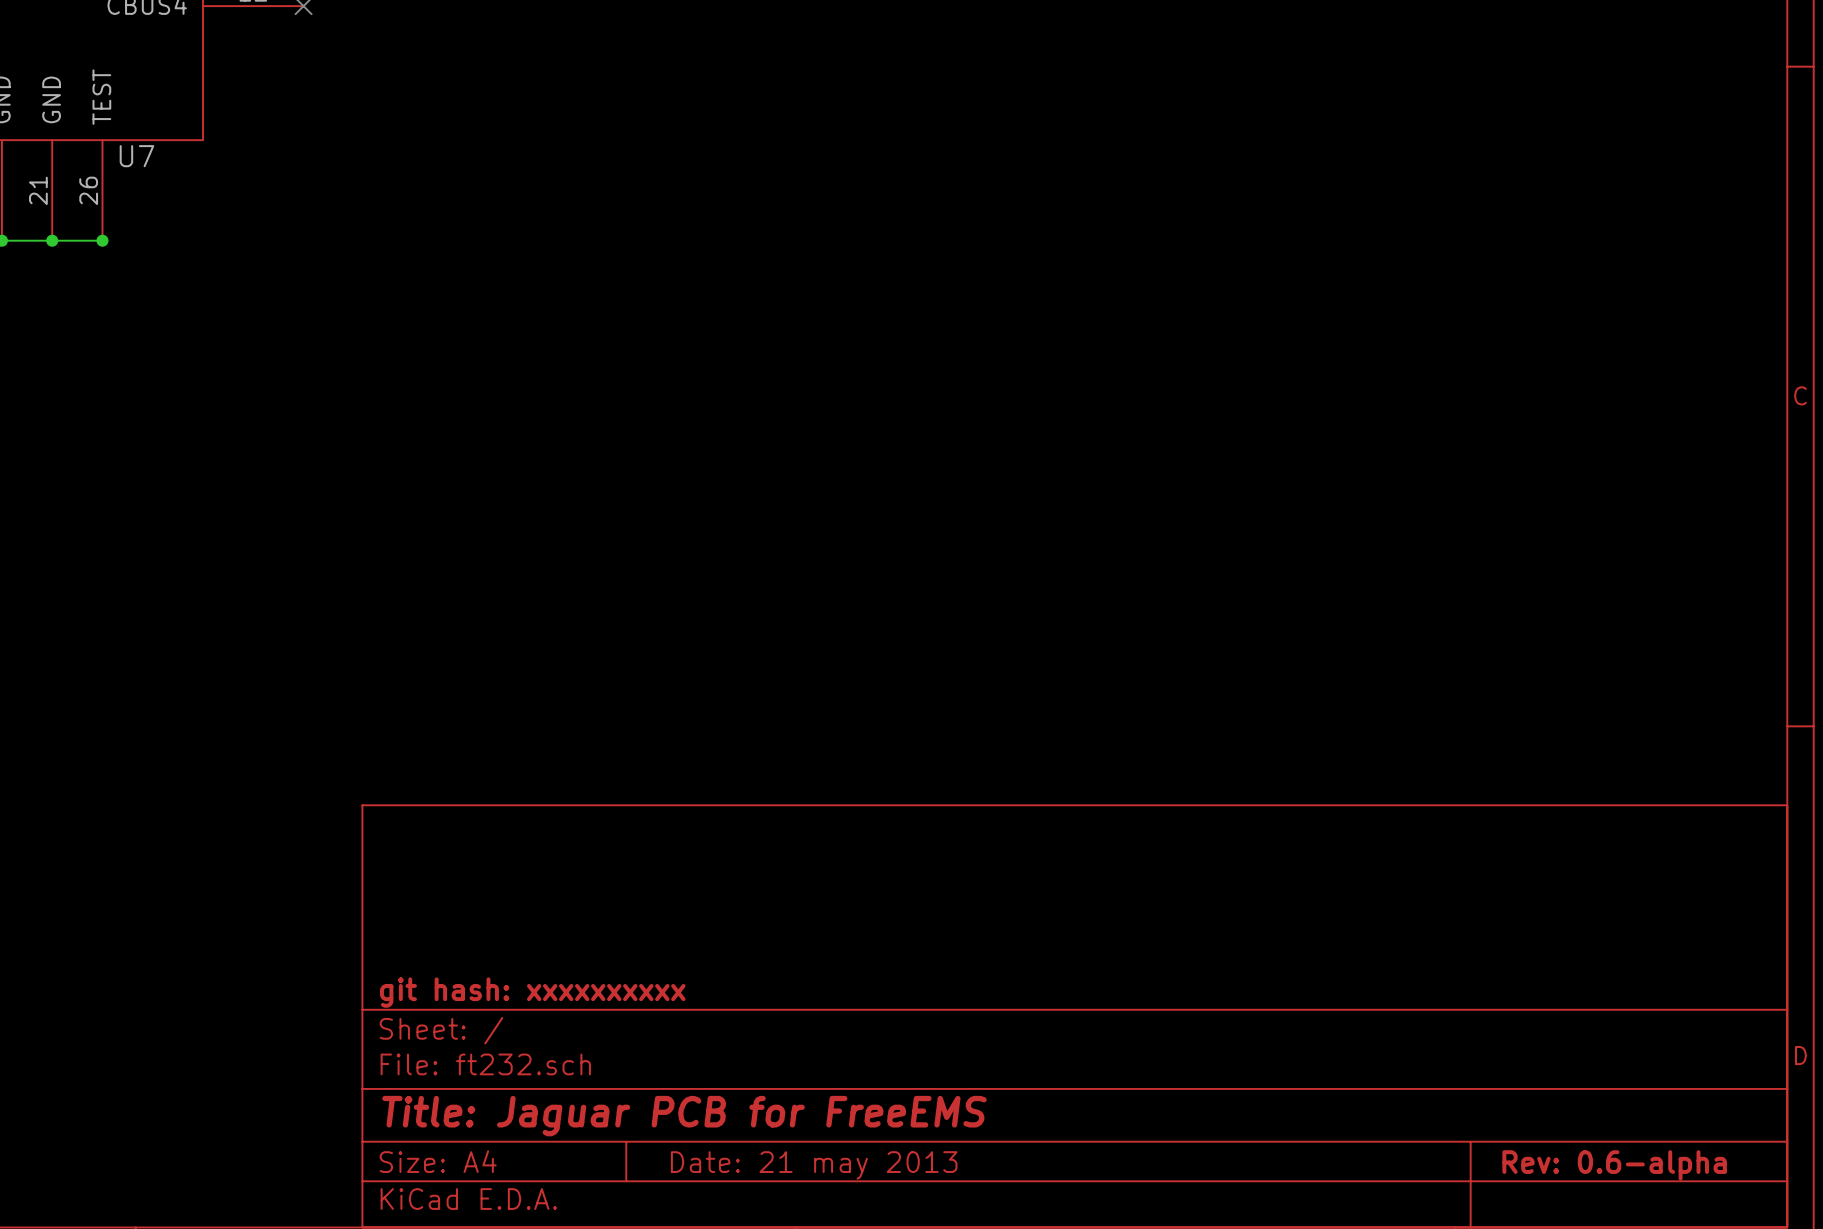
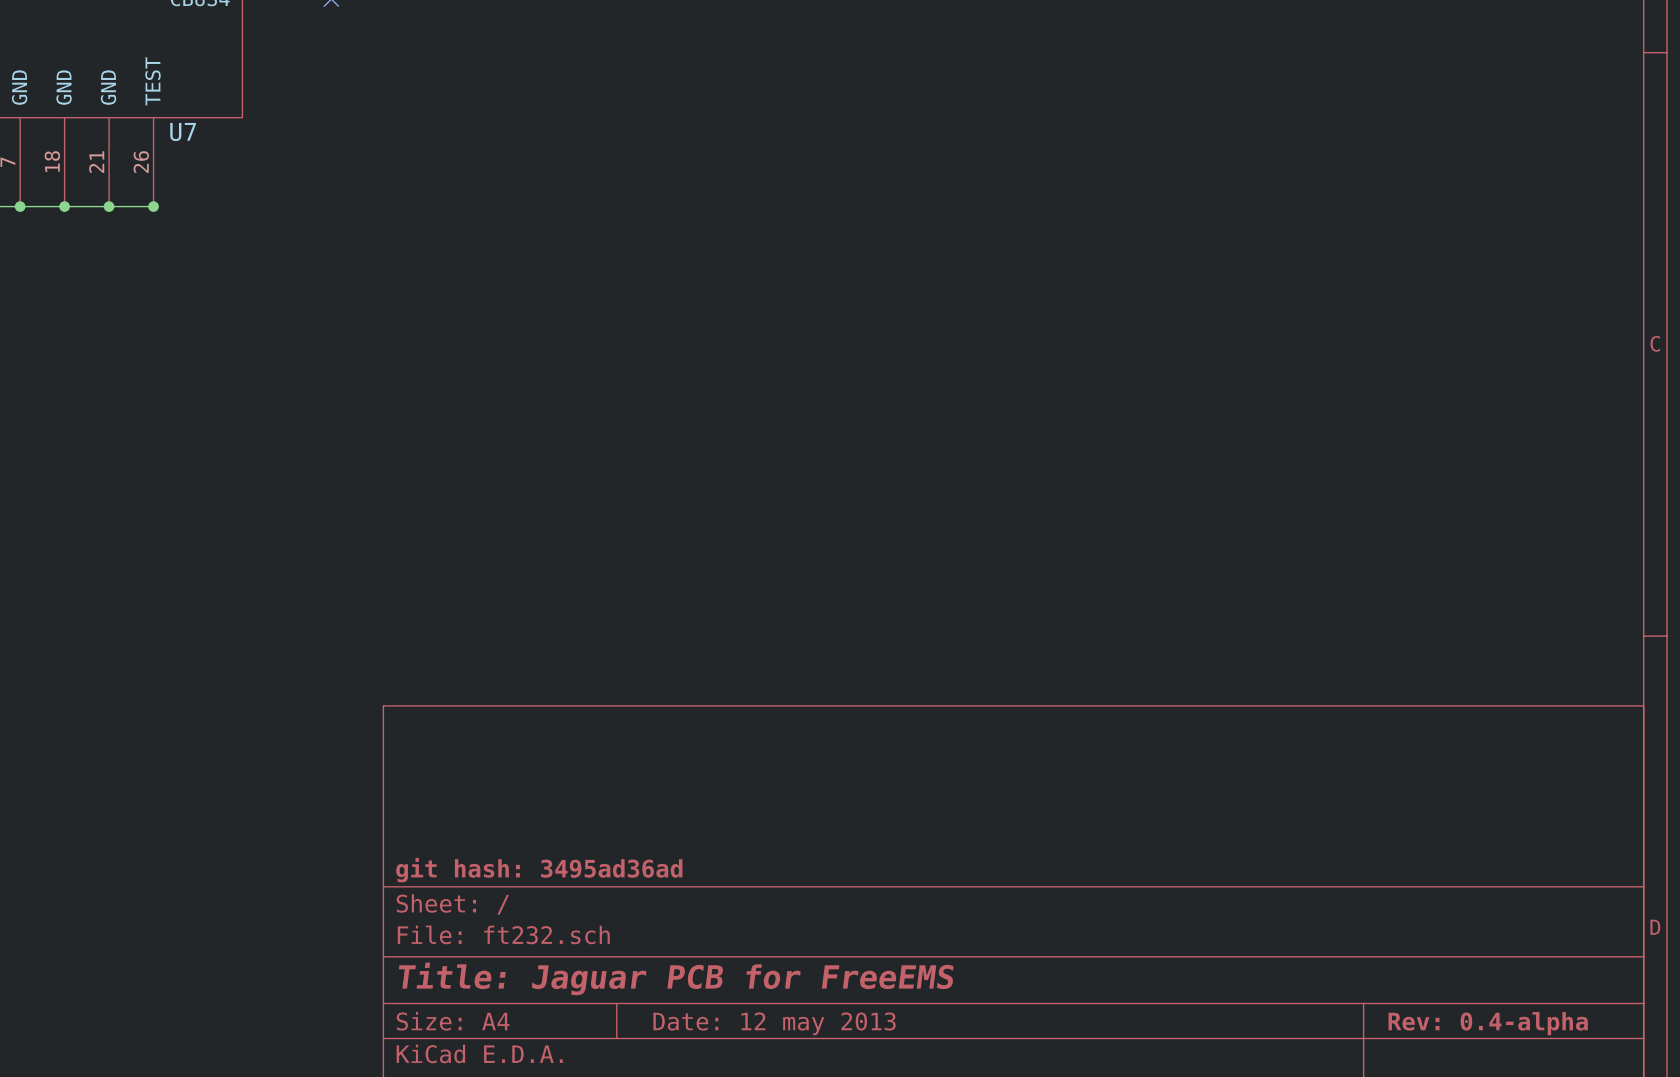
title block: git hash: xxxxxxxxxx (532, 992) -> git hash: 3495ad36ad (539, 870)
title block: Date: 21 may 2013 (814, 1165) -> Date: 12 may 2013 (774, 1023)
title block: Rev: 0.6-alpha (1614, 1165) -> Rev: 0.4-alpha (1488, 1023)

